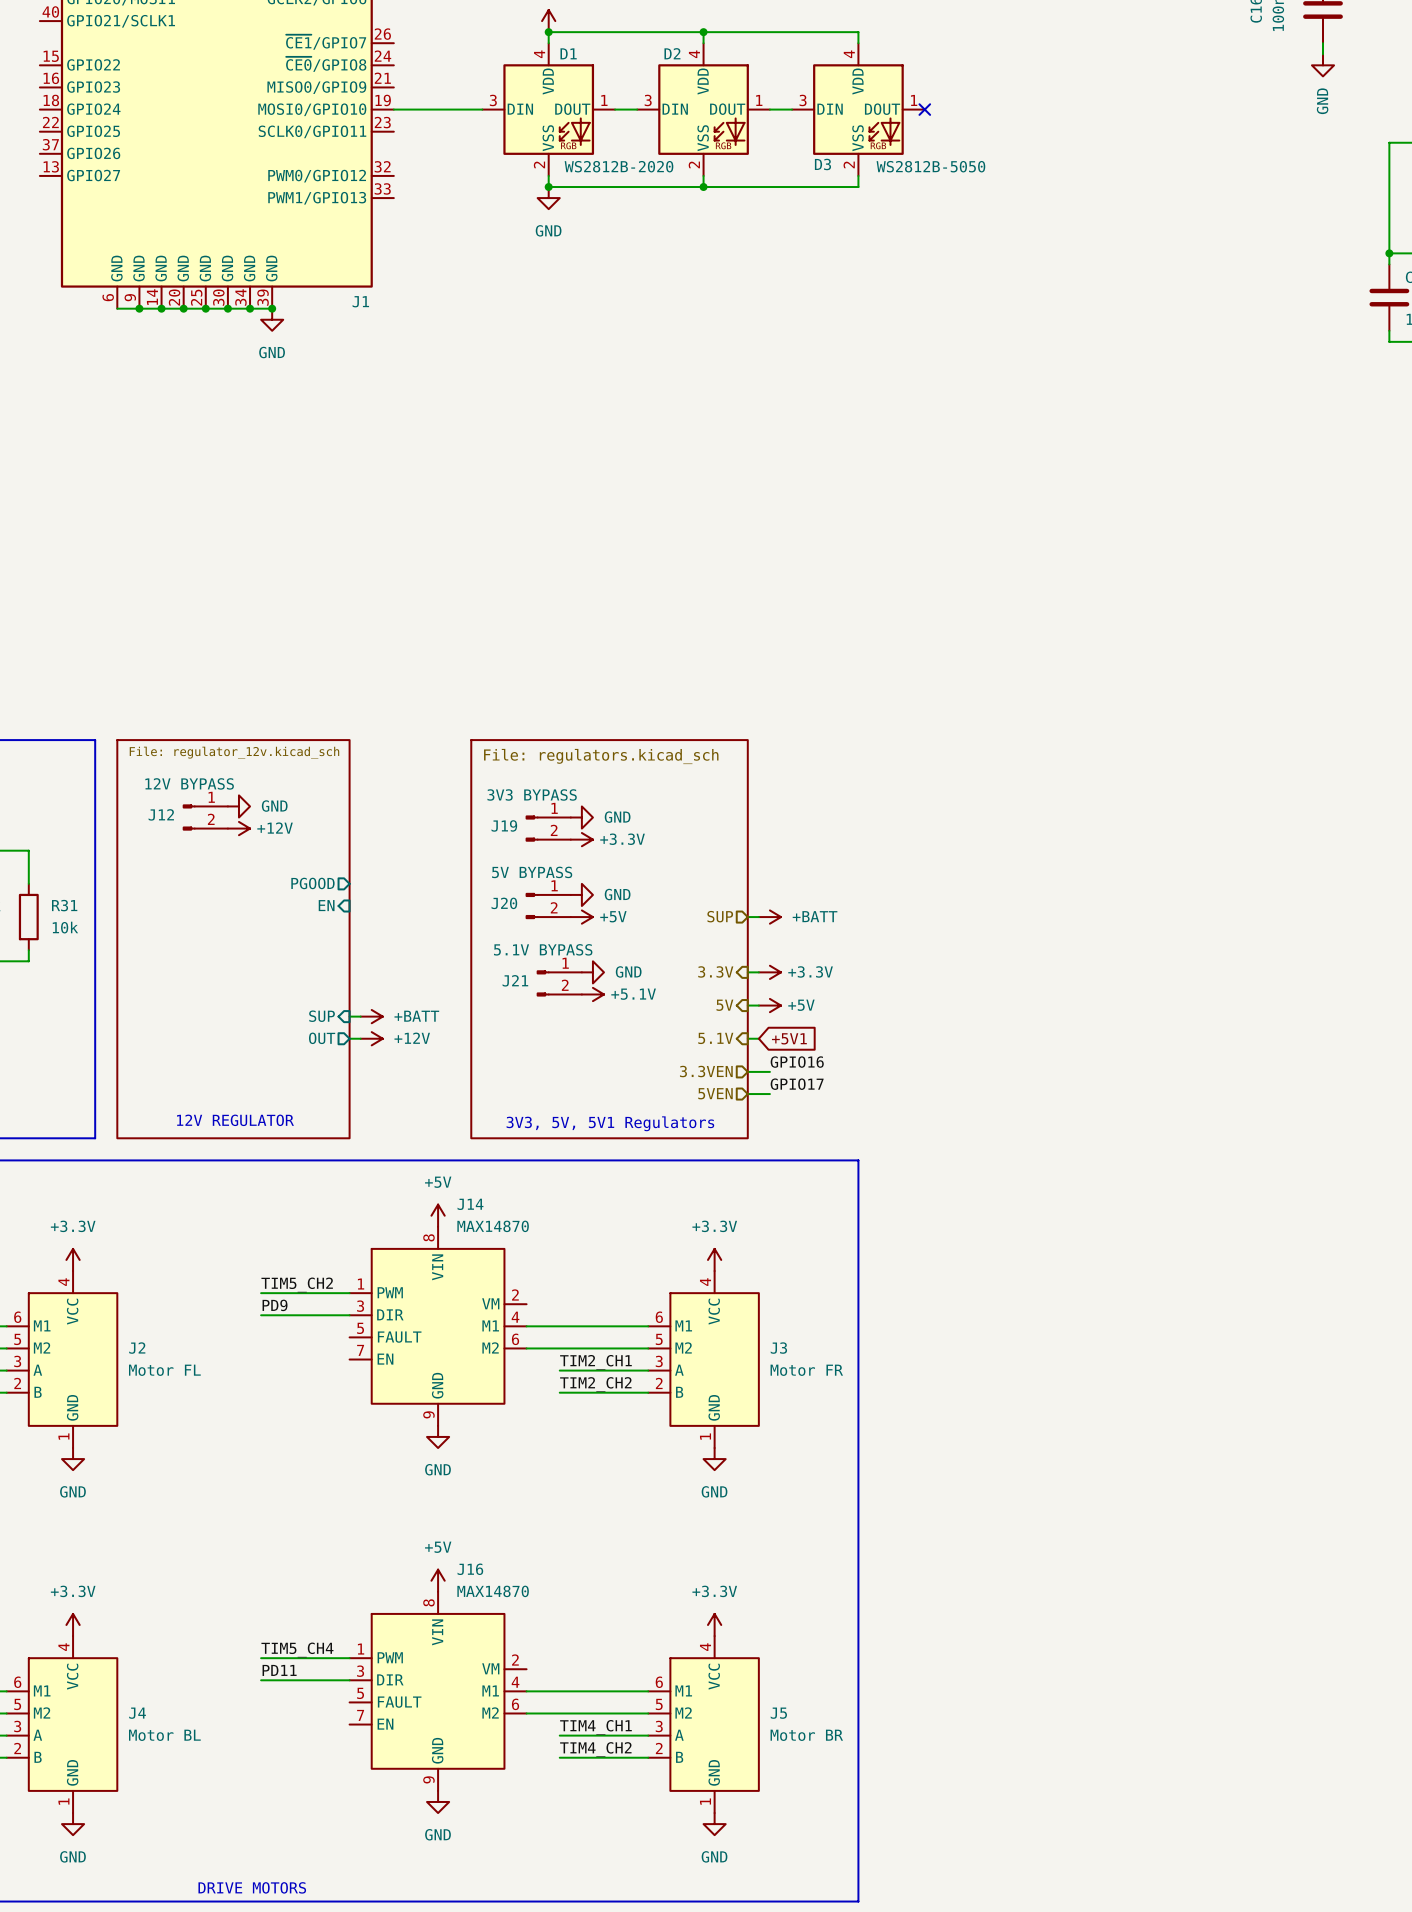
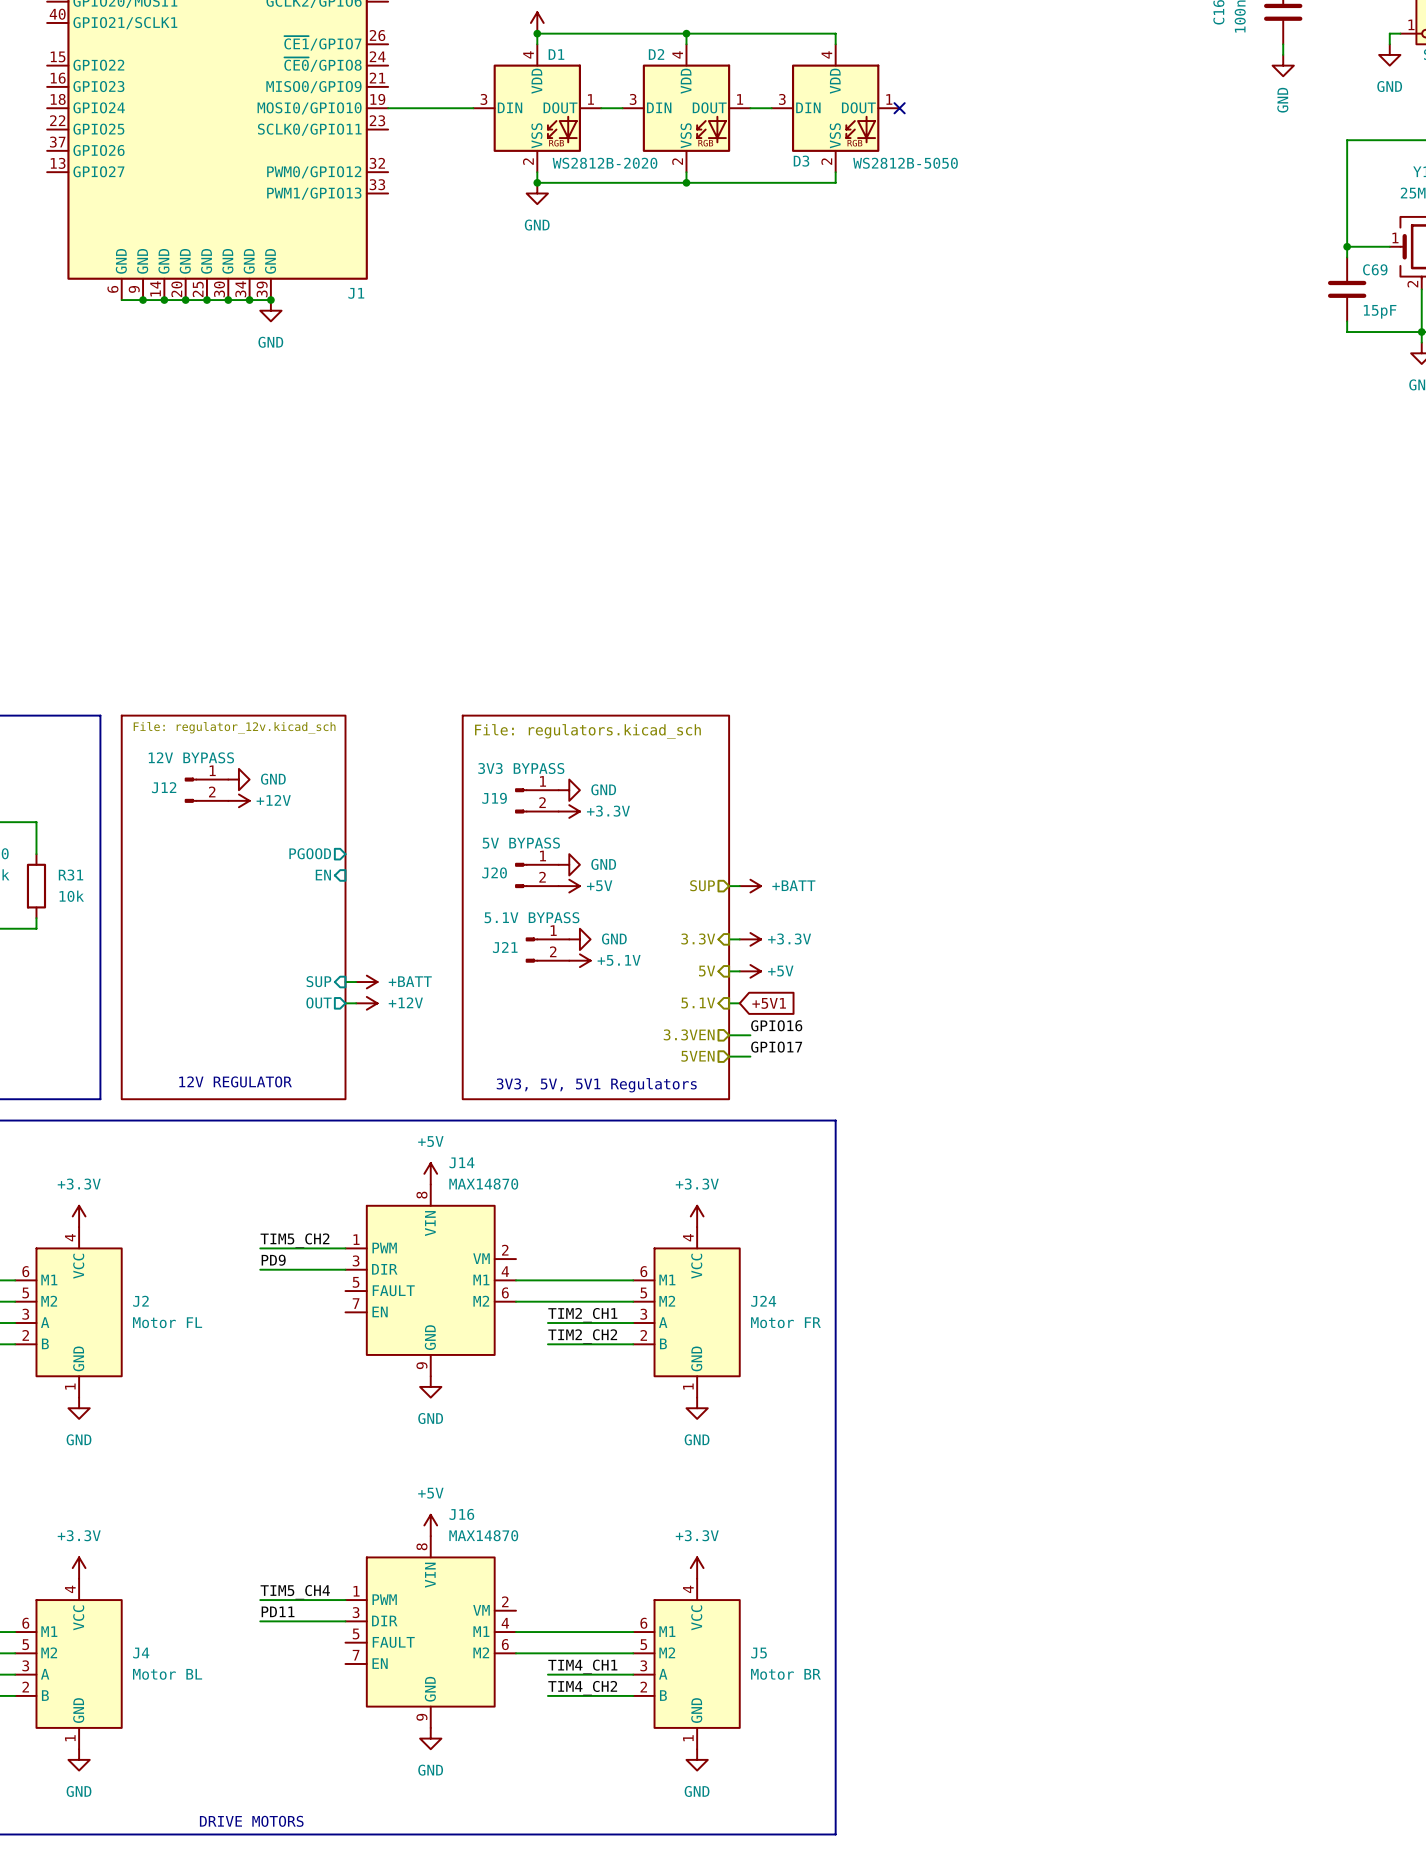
J3 name: J3 (778, 1348) -> J24 (763, 1301)

